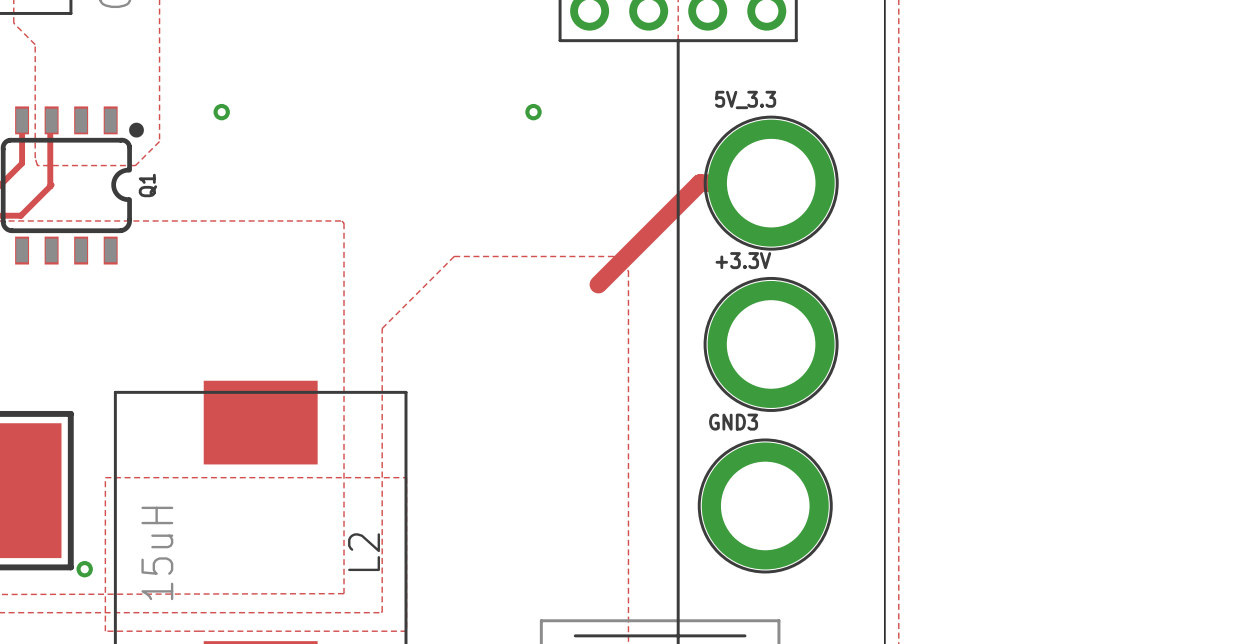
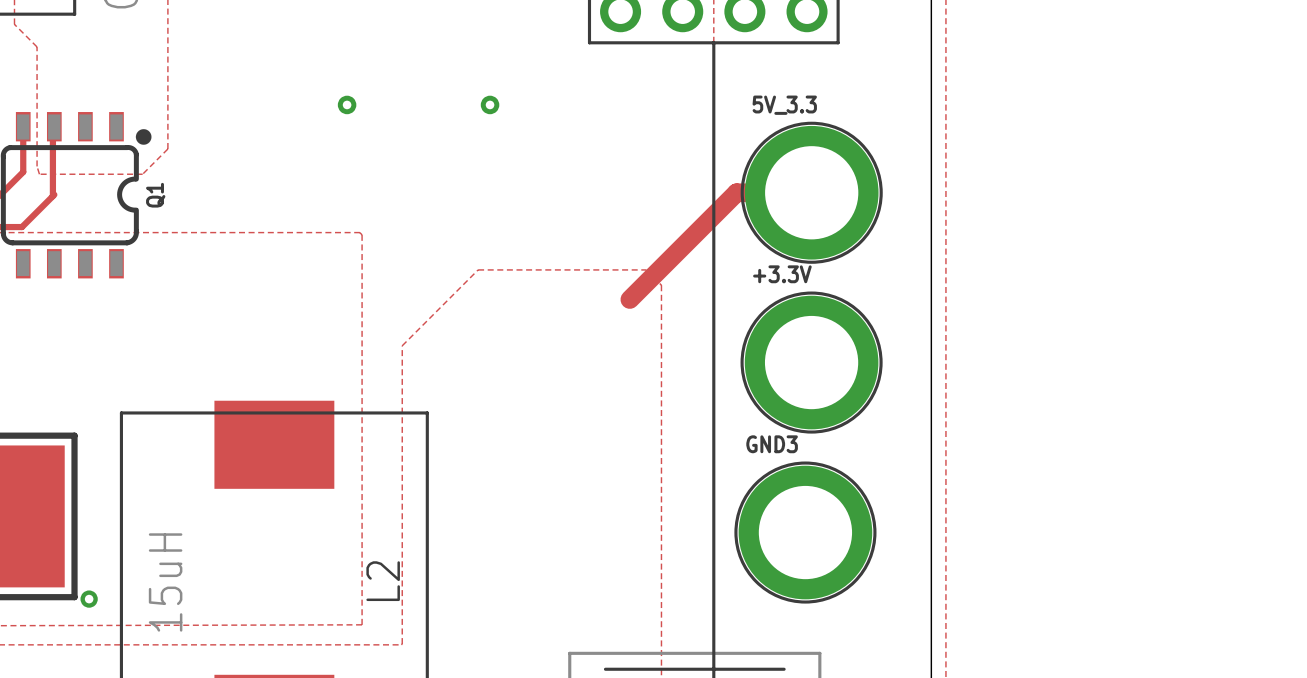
via: none -> (347, 104)
via: none -> (490, 104)
via: (221, 112) -> none
via: (533, 112) -> none
zone outline: (105, 477) (105, 631) (406, 631) (406, 477) (105, 477) -> none

